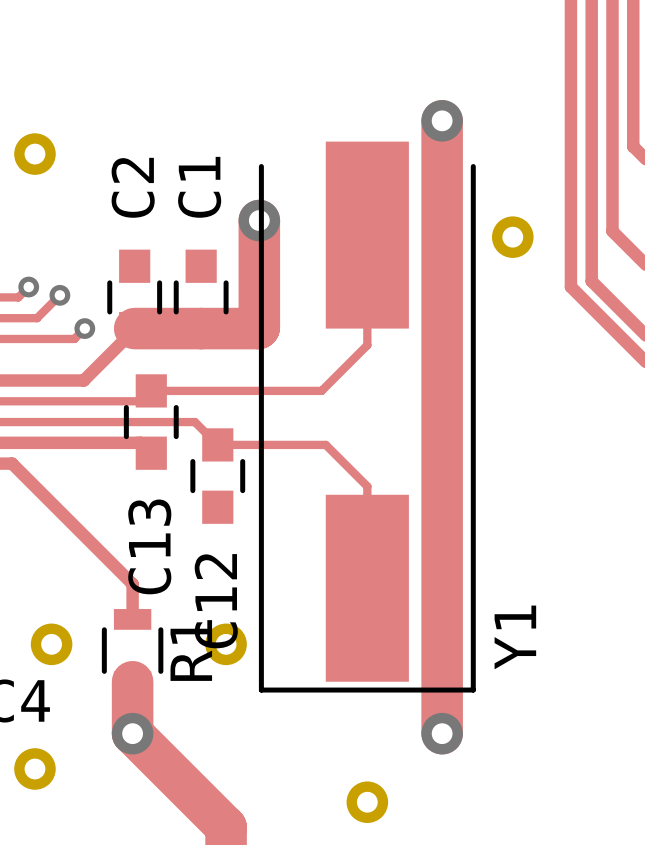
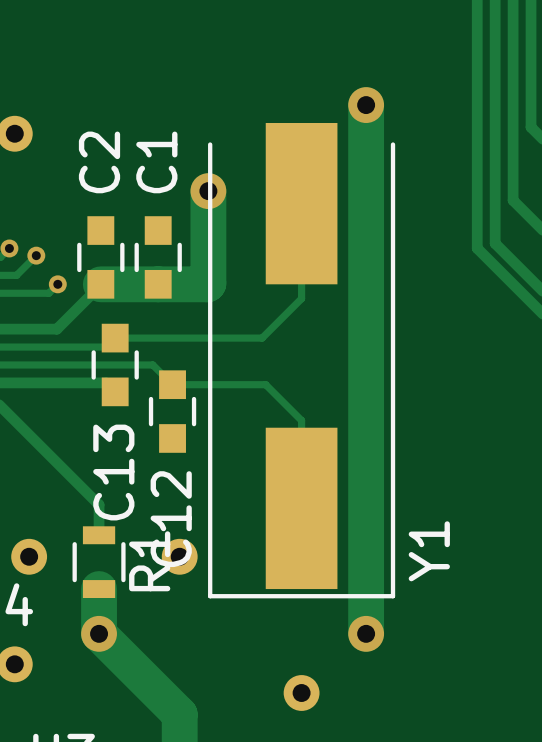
part: (512, 237) -> none

